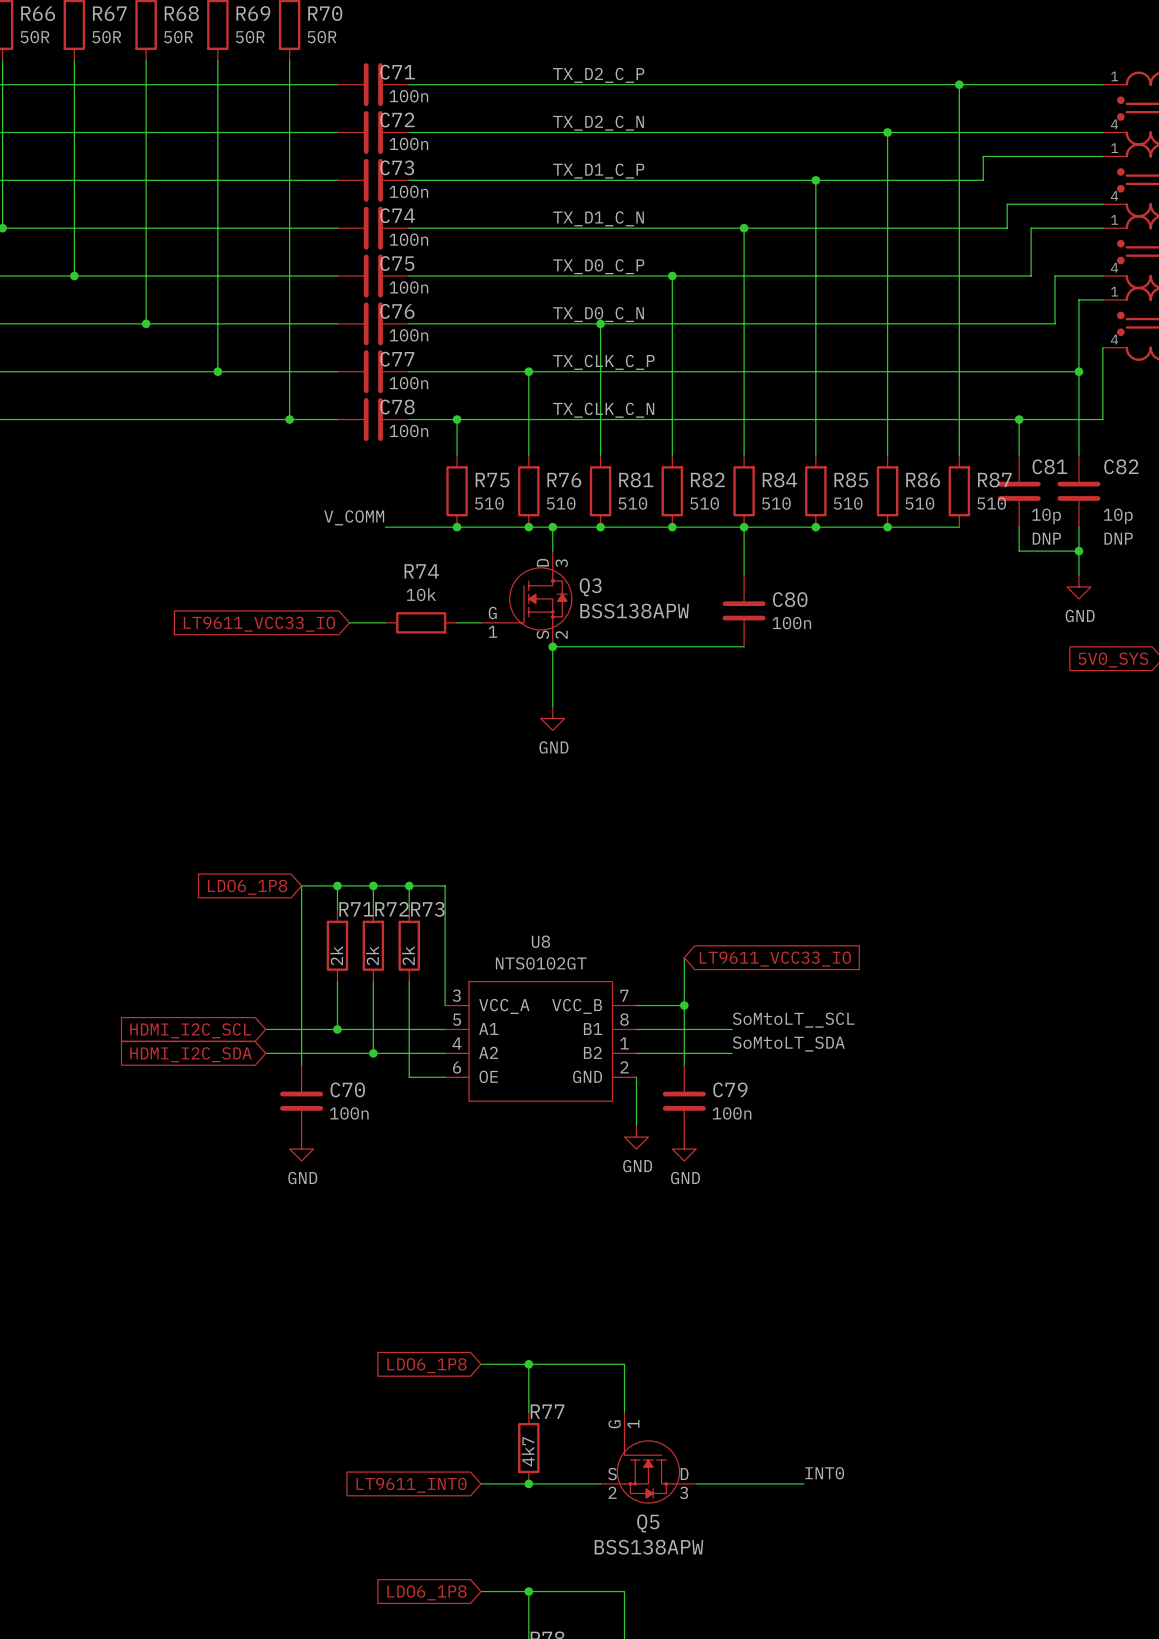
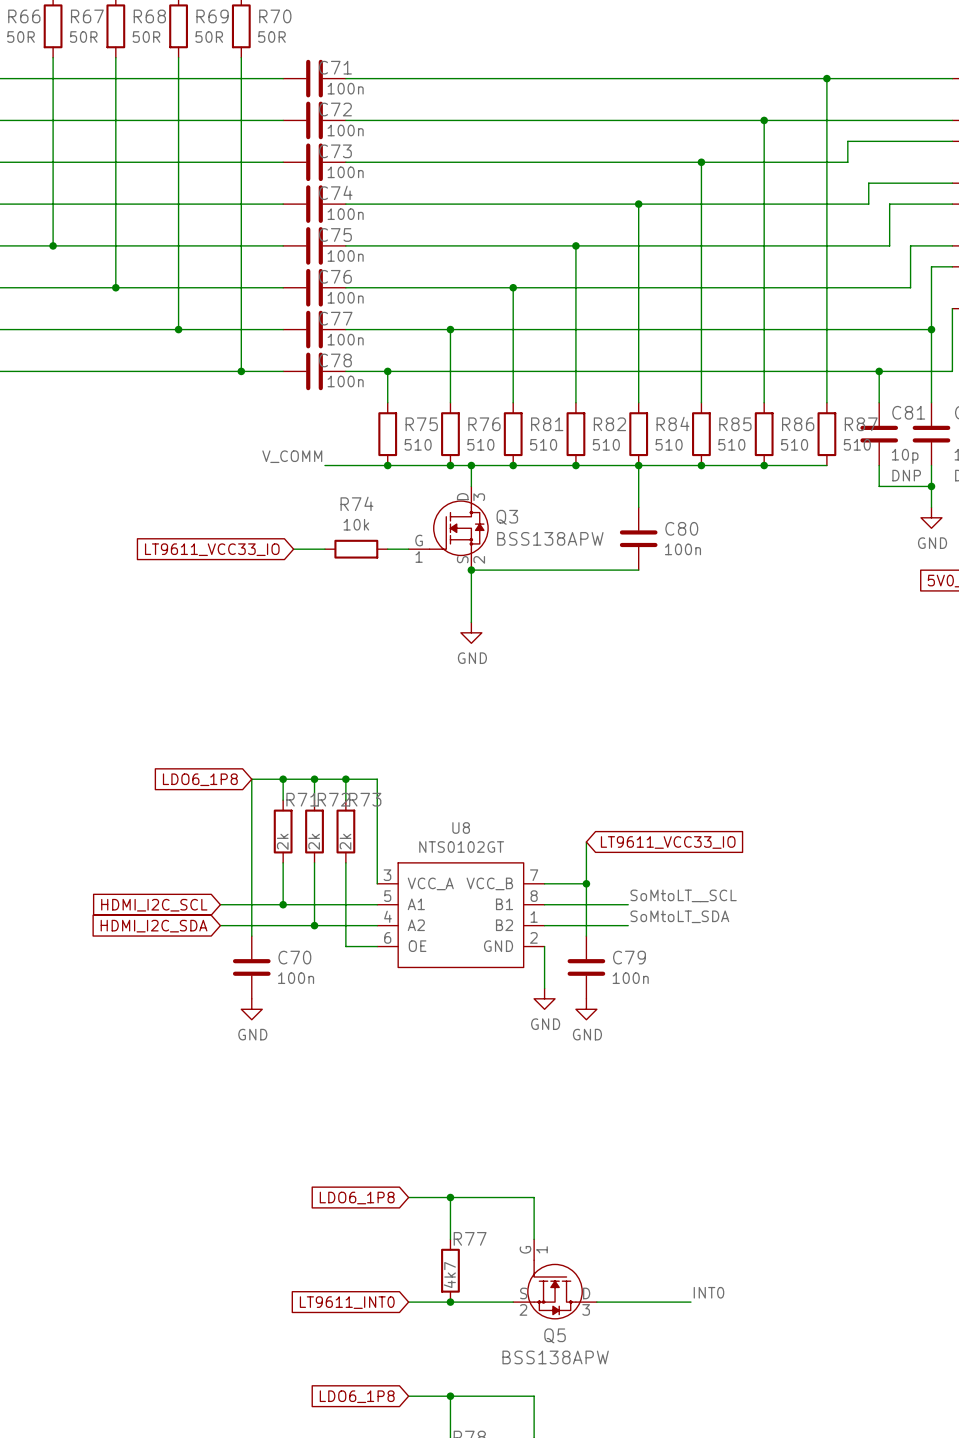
label: TX_D2_C_P (598, 75) -> none
label: TX_D2_C_N (598, 123) -> none
label: TX_D1_C_P (598, 171) -> none
label: TX_D1_C_N (598, 218) -> none
label: TX_D0_C_P (598, 266) -> none
label: TX_D0_C_N (598, 314) -> none
label: TX_CLK_C_P (603, 362) -> none
label: TX_CLK_C_N (603, 410) -> none

